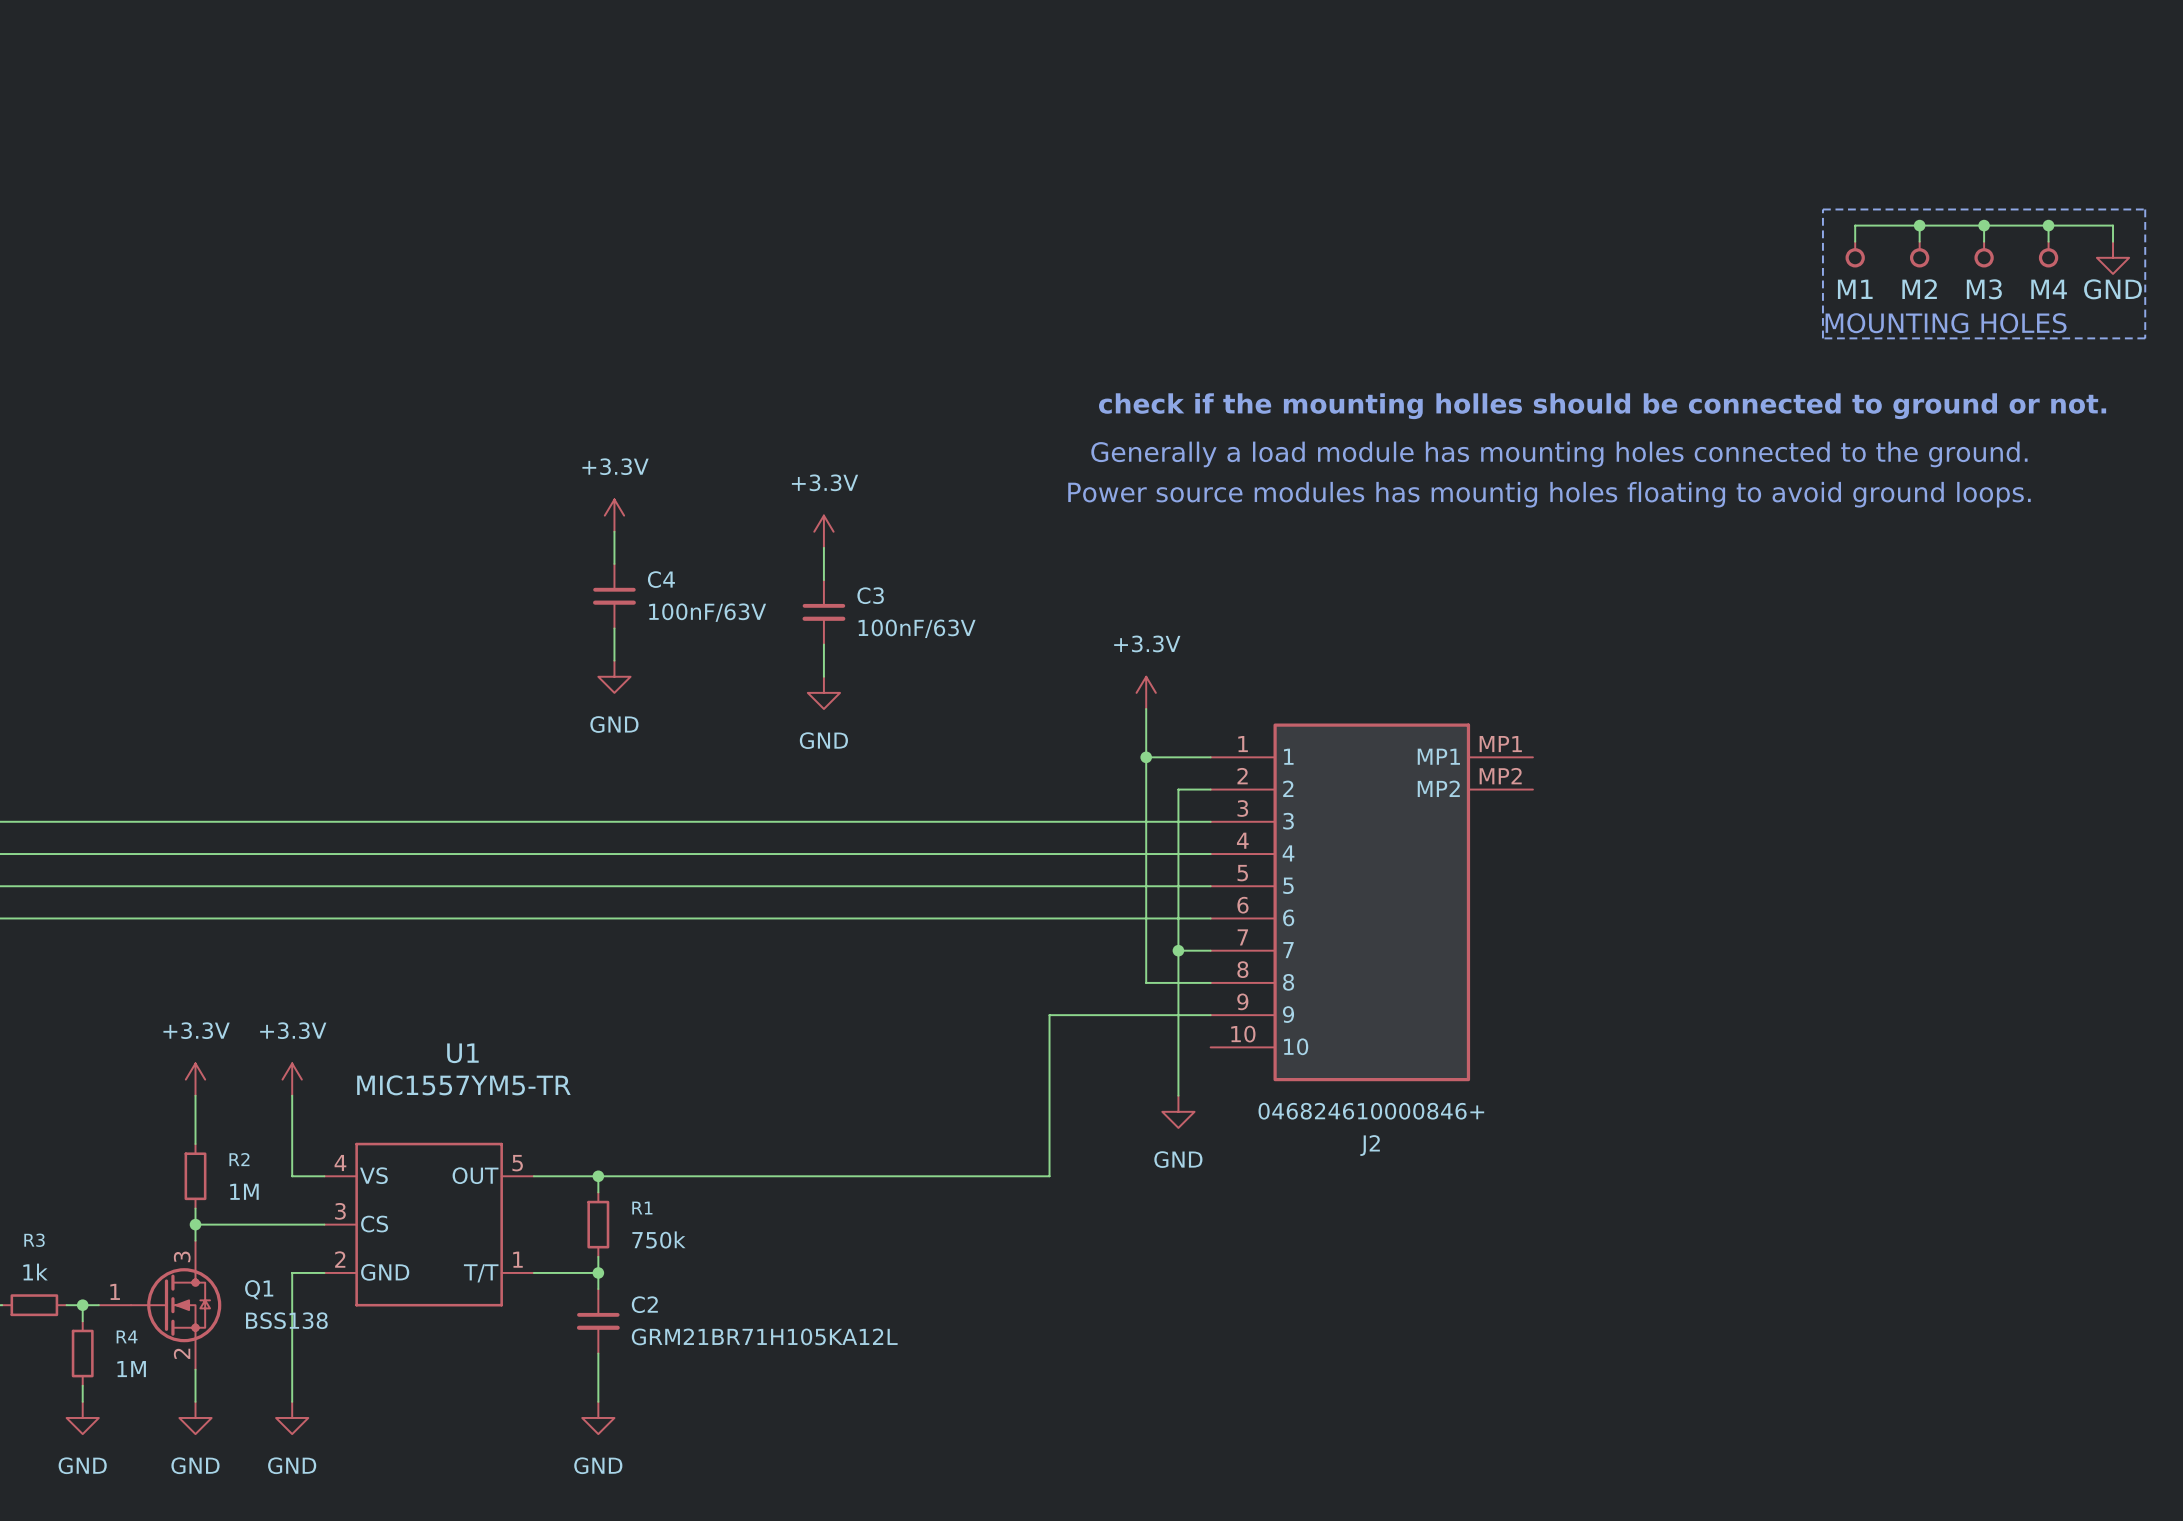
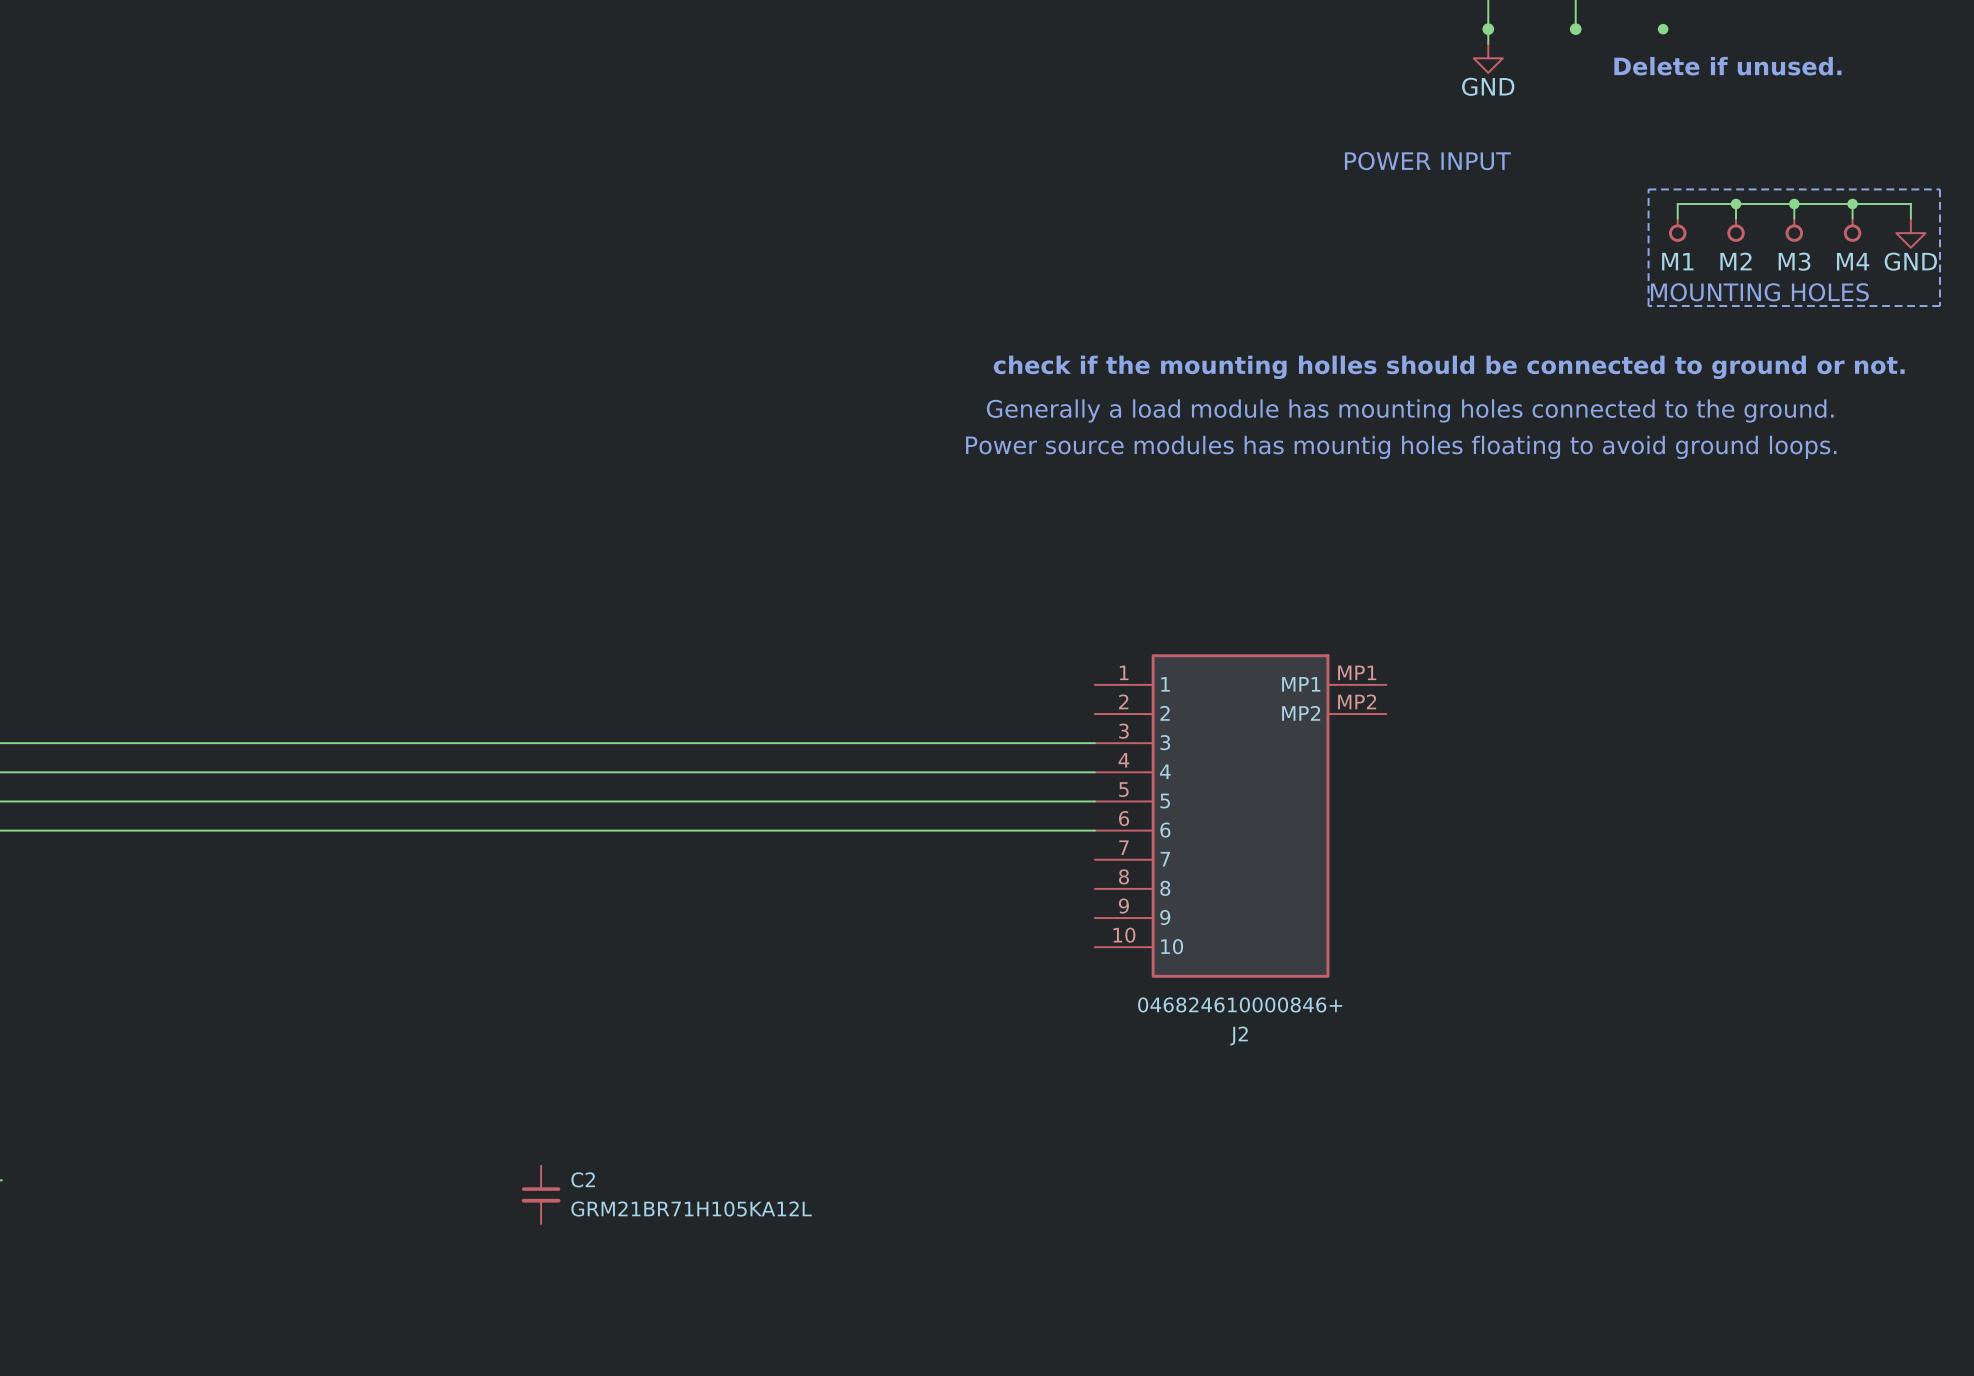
wire: none -> (1488, 0) (1488, 43)
wire: none -> (1575, 0) (1575, 29)
junction: none -> (1488, 29)
junction: none -> (1575, 29)
junction: none -> (1663, 29)
power symbol: none -> GND (1488, 58)
text: none -> Delete if unused. (1727, 66)
text: none -> POWER INPUT (1427, 161)
power symbol: +3.3V (614, 515) -> none
wire: (614, 531) (614, 563) -> none
power symbol: +3.3V (823, 531) -> none
wire: (823, 547) (823, 580) -> none
C4: 100nF/63V (614, 596) -> none
C3: 100nF/63V (823, 612) -> none
wire: (614, 628) (614, 660) -> none
wire: (823, 644) (823, 676) -> none
power symbol: GND (614, 676) -> none
power symbol: GND (823, 692) -> none
power symbol: +3.3V (1146, 692) -> none
wire: (1146, 708) (1146, 982) (1210, 982) -> none
wire: (1146, 757) (1210, 757) -> none
junction: (1146, 757) -> none
wire: (1210, 789) (1178, 789) (1178, 1095) -> none
wire: (1178, 950) (1210, 950) -> none
junction: (1178, 950) -> none
wire: (1210, 1015) (1049, 1015) (1049, 1176) (533, 1176) -> none
power symbol: +3.3V (195, 1079) -> none
power symbol: +3.3V (292, 1079) -> none
wire: (195, 1095) (195, 1144) -> none
wire: (292, 1095) (292, 1176) (324, 1176) -> none
power symbol: GND (1178, 1111) -> none
R2: 1M (195, 1176) -> none
wire: (598, 1176) (598, 1192) -> none
junction: (598, 1176) -> none
wire: (195, 1208) (195, 1240) -> none
wire: (195, 1224) (324, 1224) -> none
junction: (195, 1224) -> none
U1: MIC1557YM5-TR (429, 1224) -> none
R1: 750k (598, 1224) -> none
wire: (598, 1256) (598, 1289) -> none
wire: (324, 1272) (292, 1272) (292, 1401) -> none
wire: (533, 1272) (598, 1272) -> none
junction: (598, 1272) -> none
R3: 1k (34, 1305) -> none
wire: (66, 1305) (98, 1305) -> none
wire: (82, 1305) (82, 1321) -> none
junction: (82, 1305) -> none
Q1: BSS138 (160, 1305) -> none
R4: 1M (82, 1353) -> none
wire: (598, 1353) (598, 1401) -> none
wire: (195, 1369) (195, 1401) -> none
wire: (82, 1385) (82, 1401) -> none
power symbol: GND (82, 1417) -> none
power symbol: GND (195, 1417) -> none
power symbol: GND (292, 1417) -> none
power symbol: GND (598, 1417) -> none

